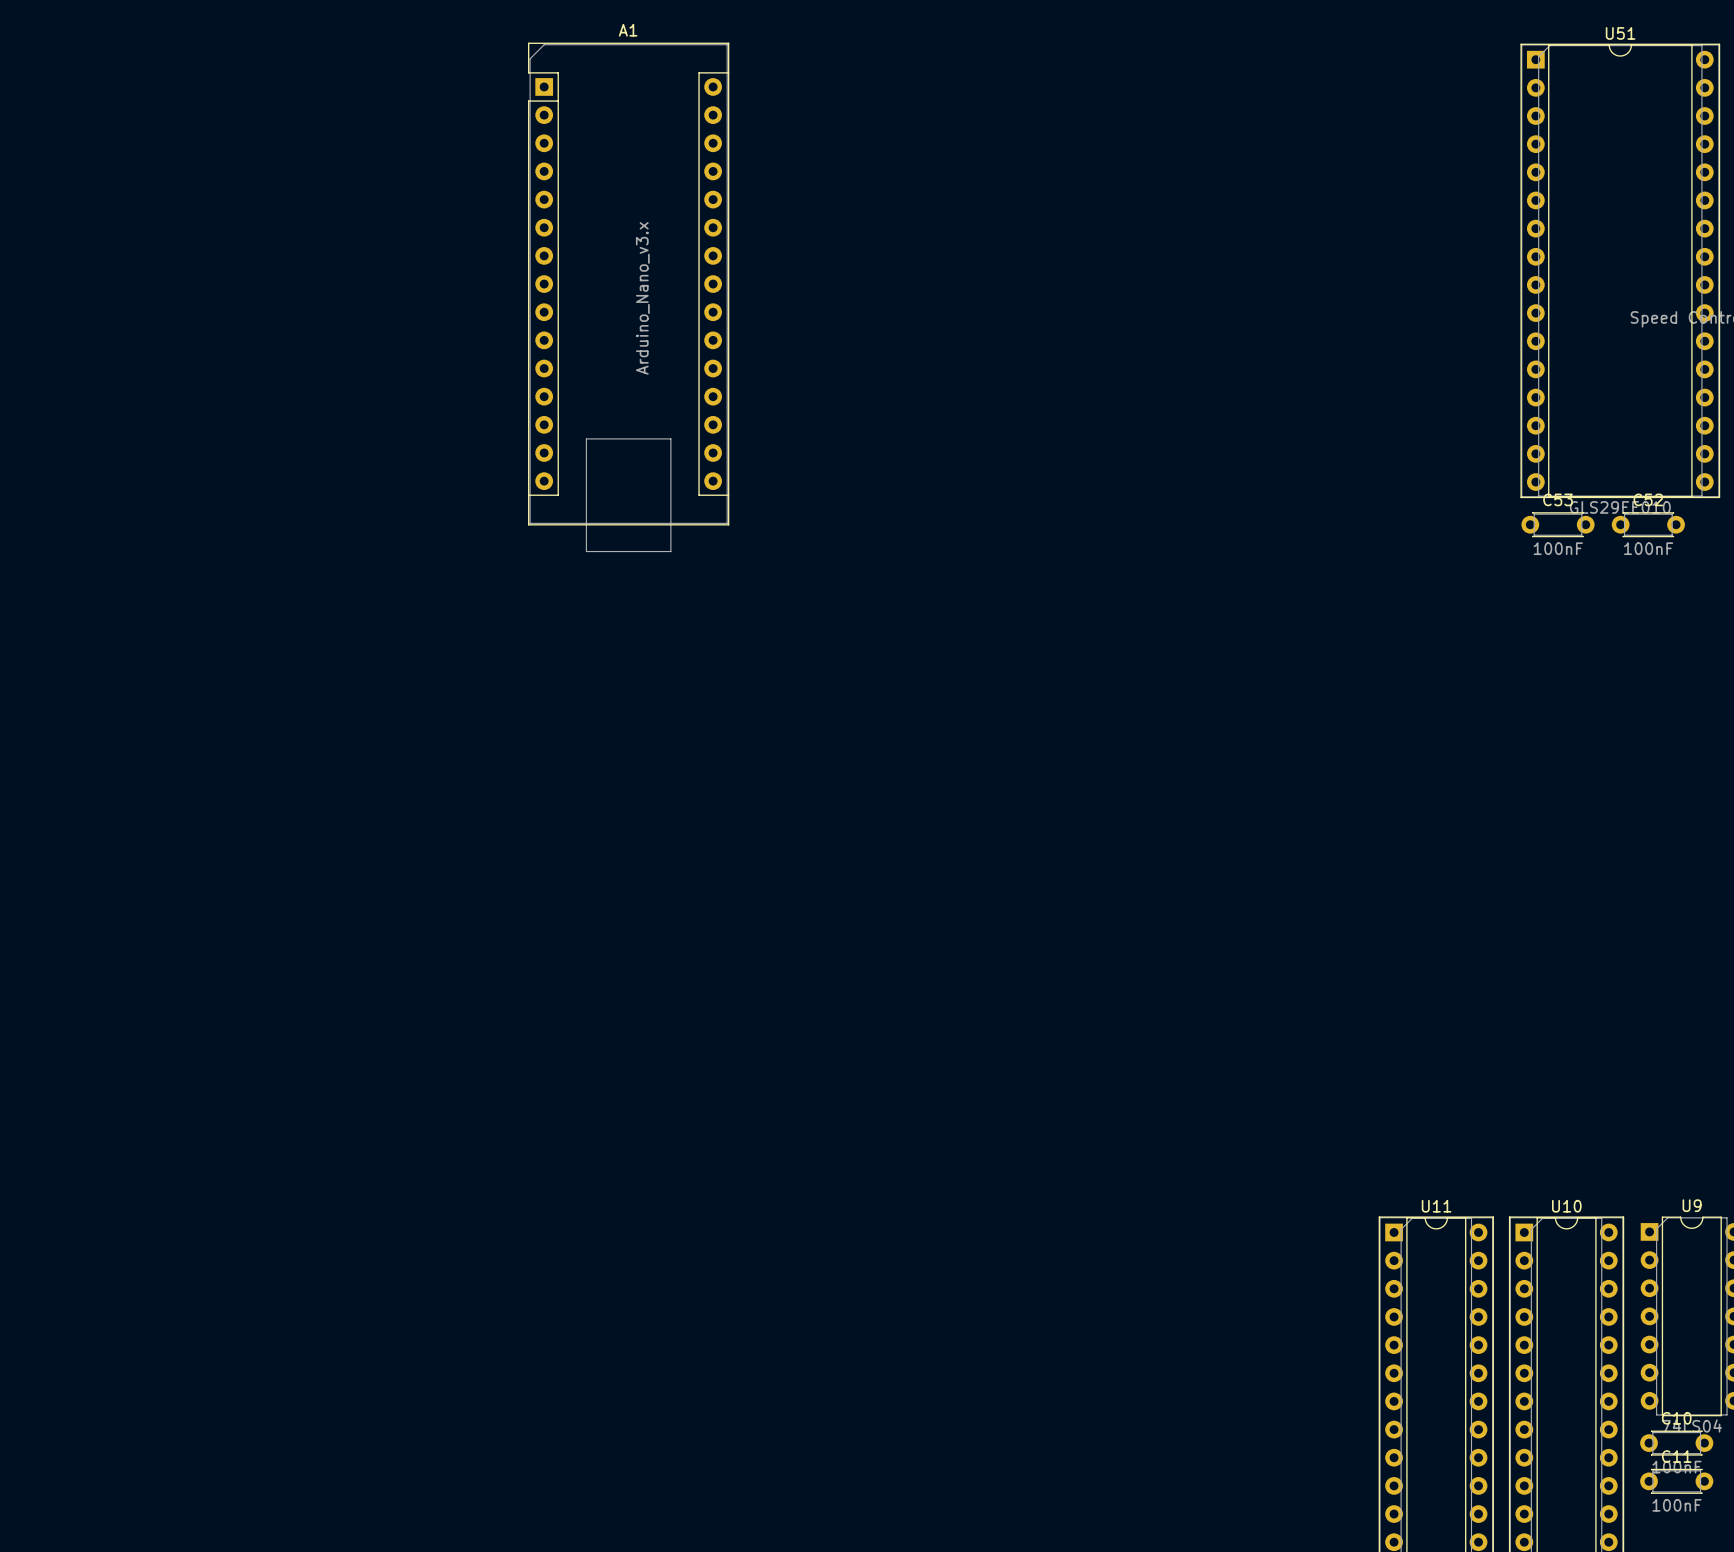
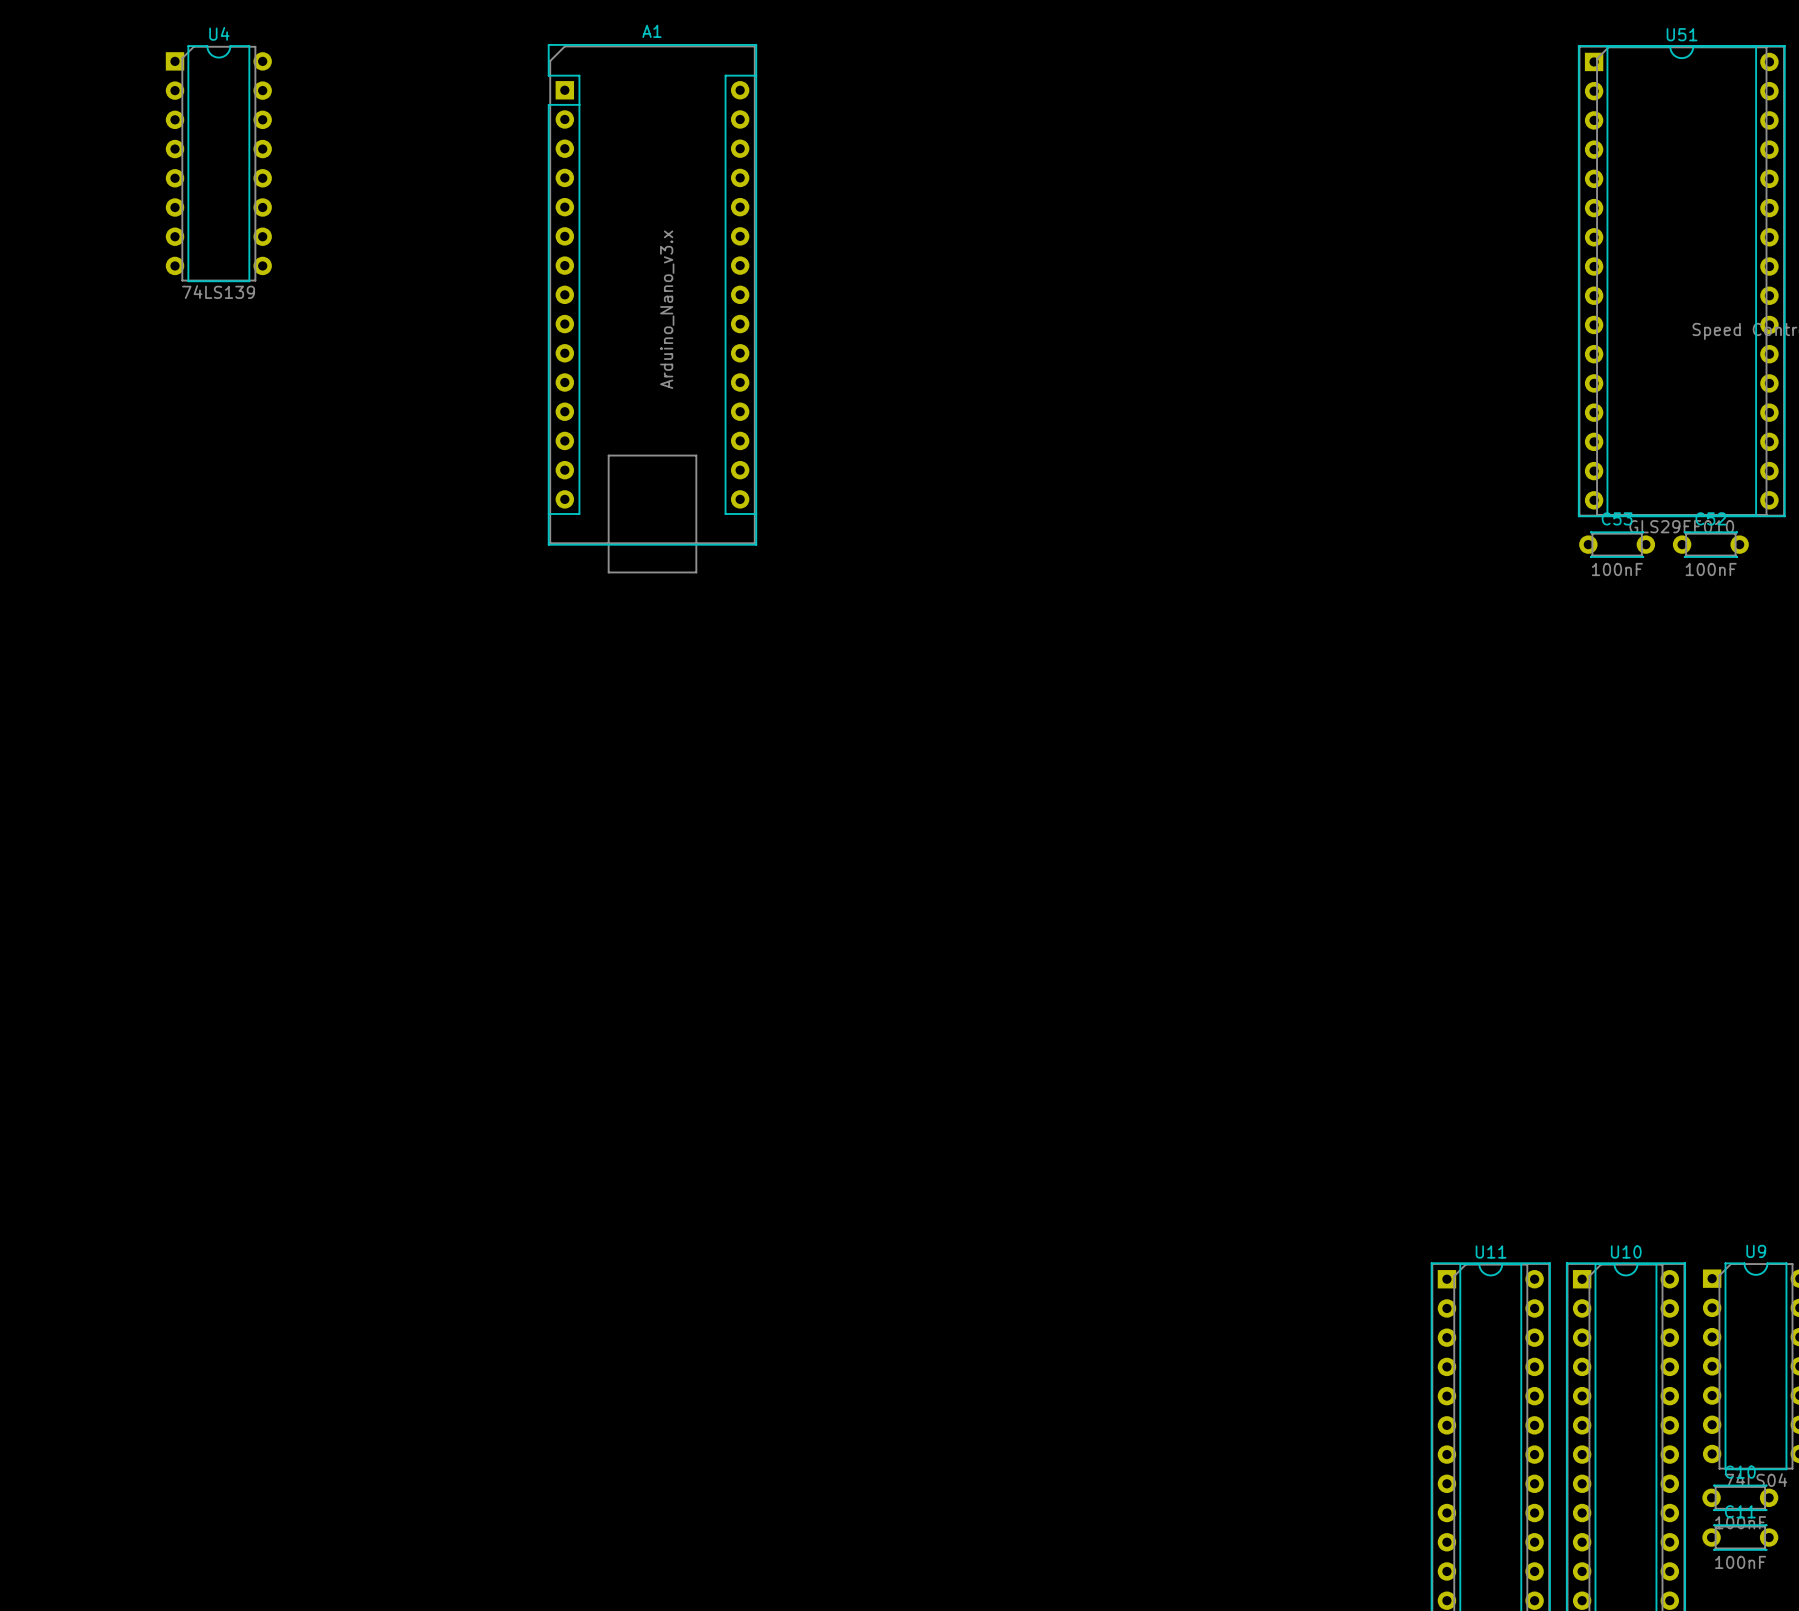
U4: none -> 74LS139 (218, 163)

